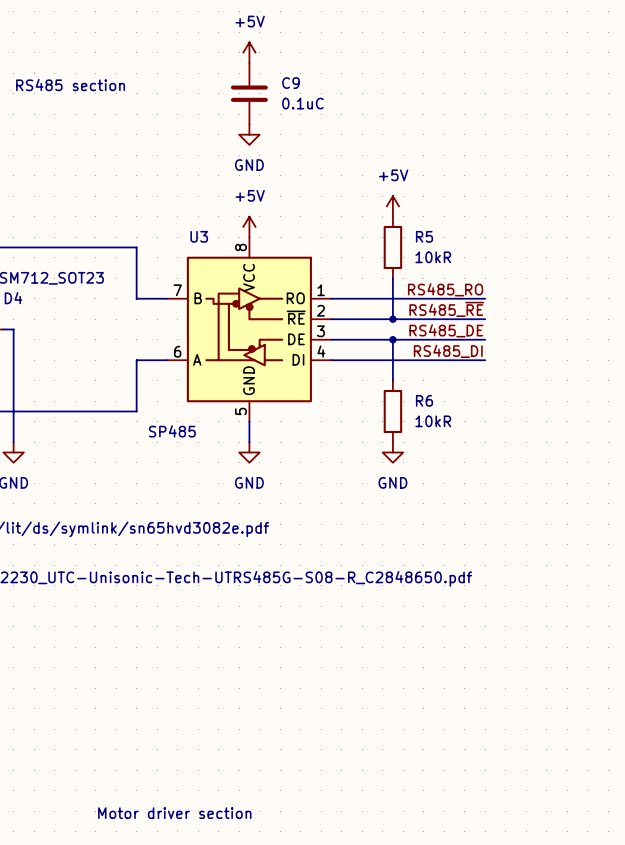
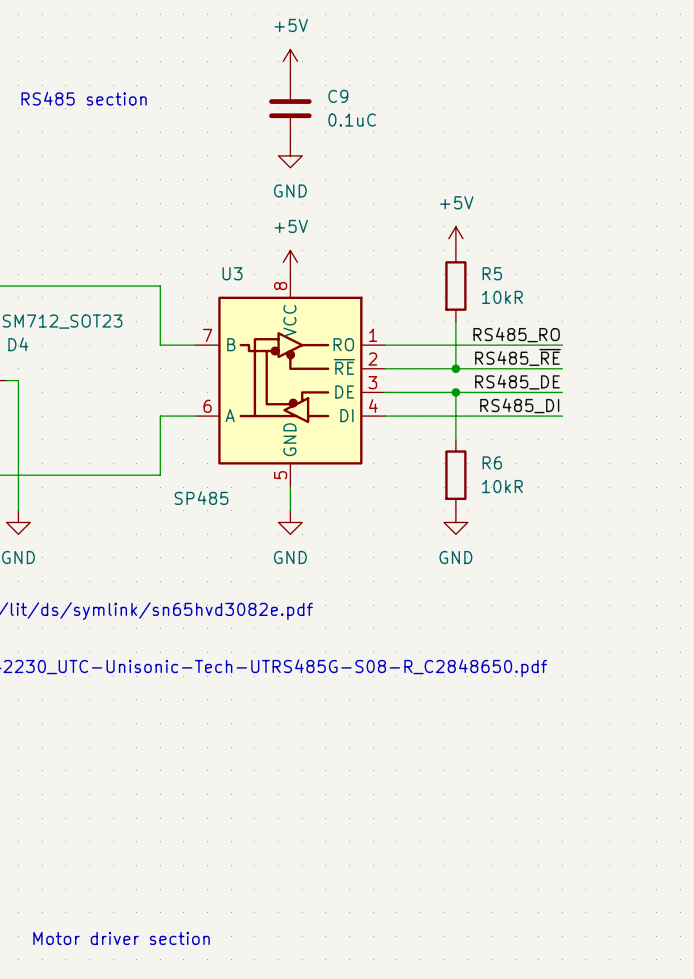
text position: Motor driver section (174, 813) -> Motor driver section (121, 938)

